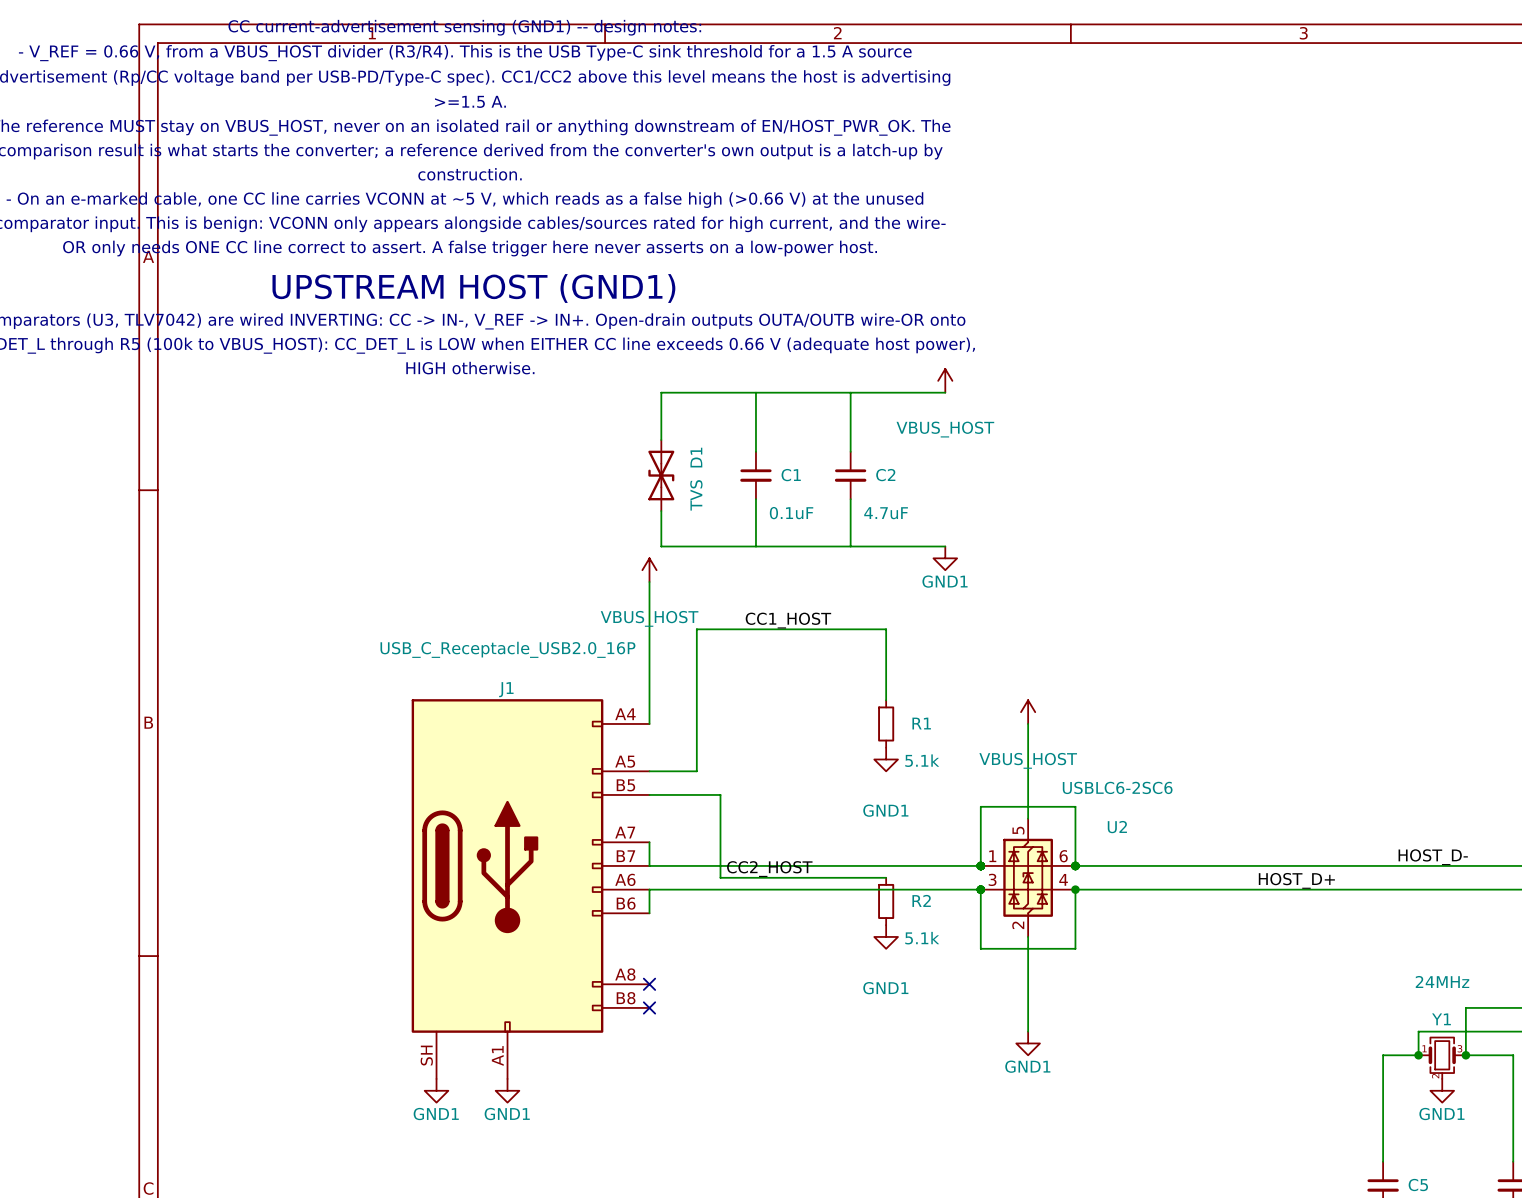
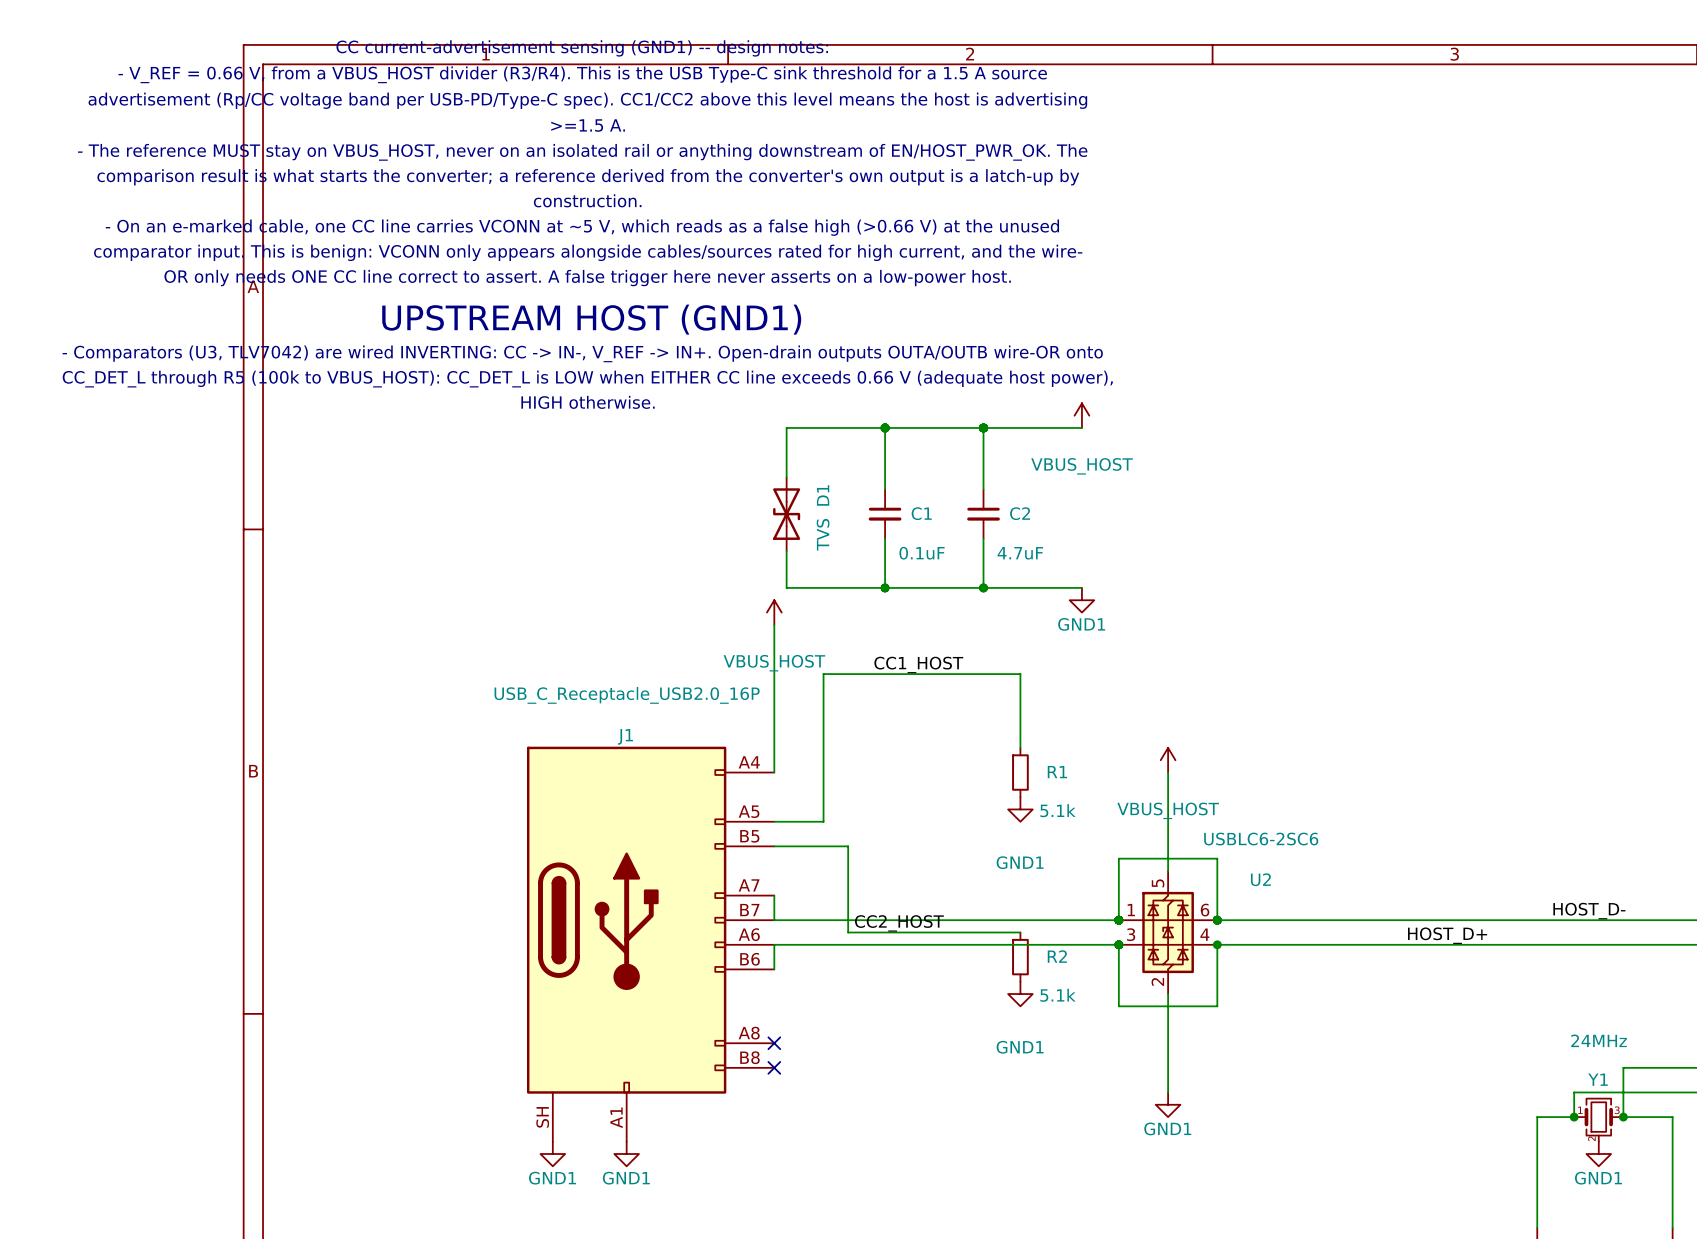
junction: none -> (885, 427)
junction: none -> (983, 427)
junction: none -> (885, 587)
junction: none -> (983, 587)

